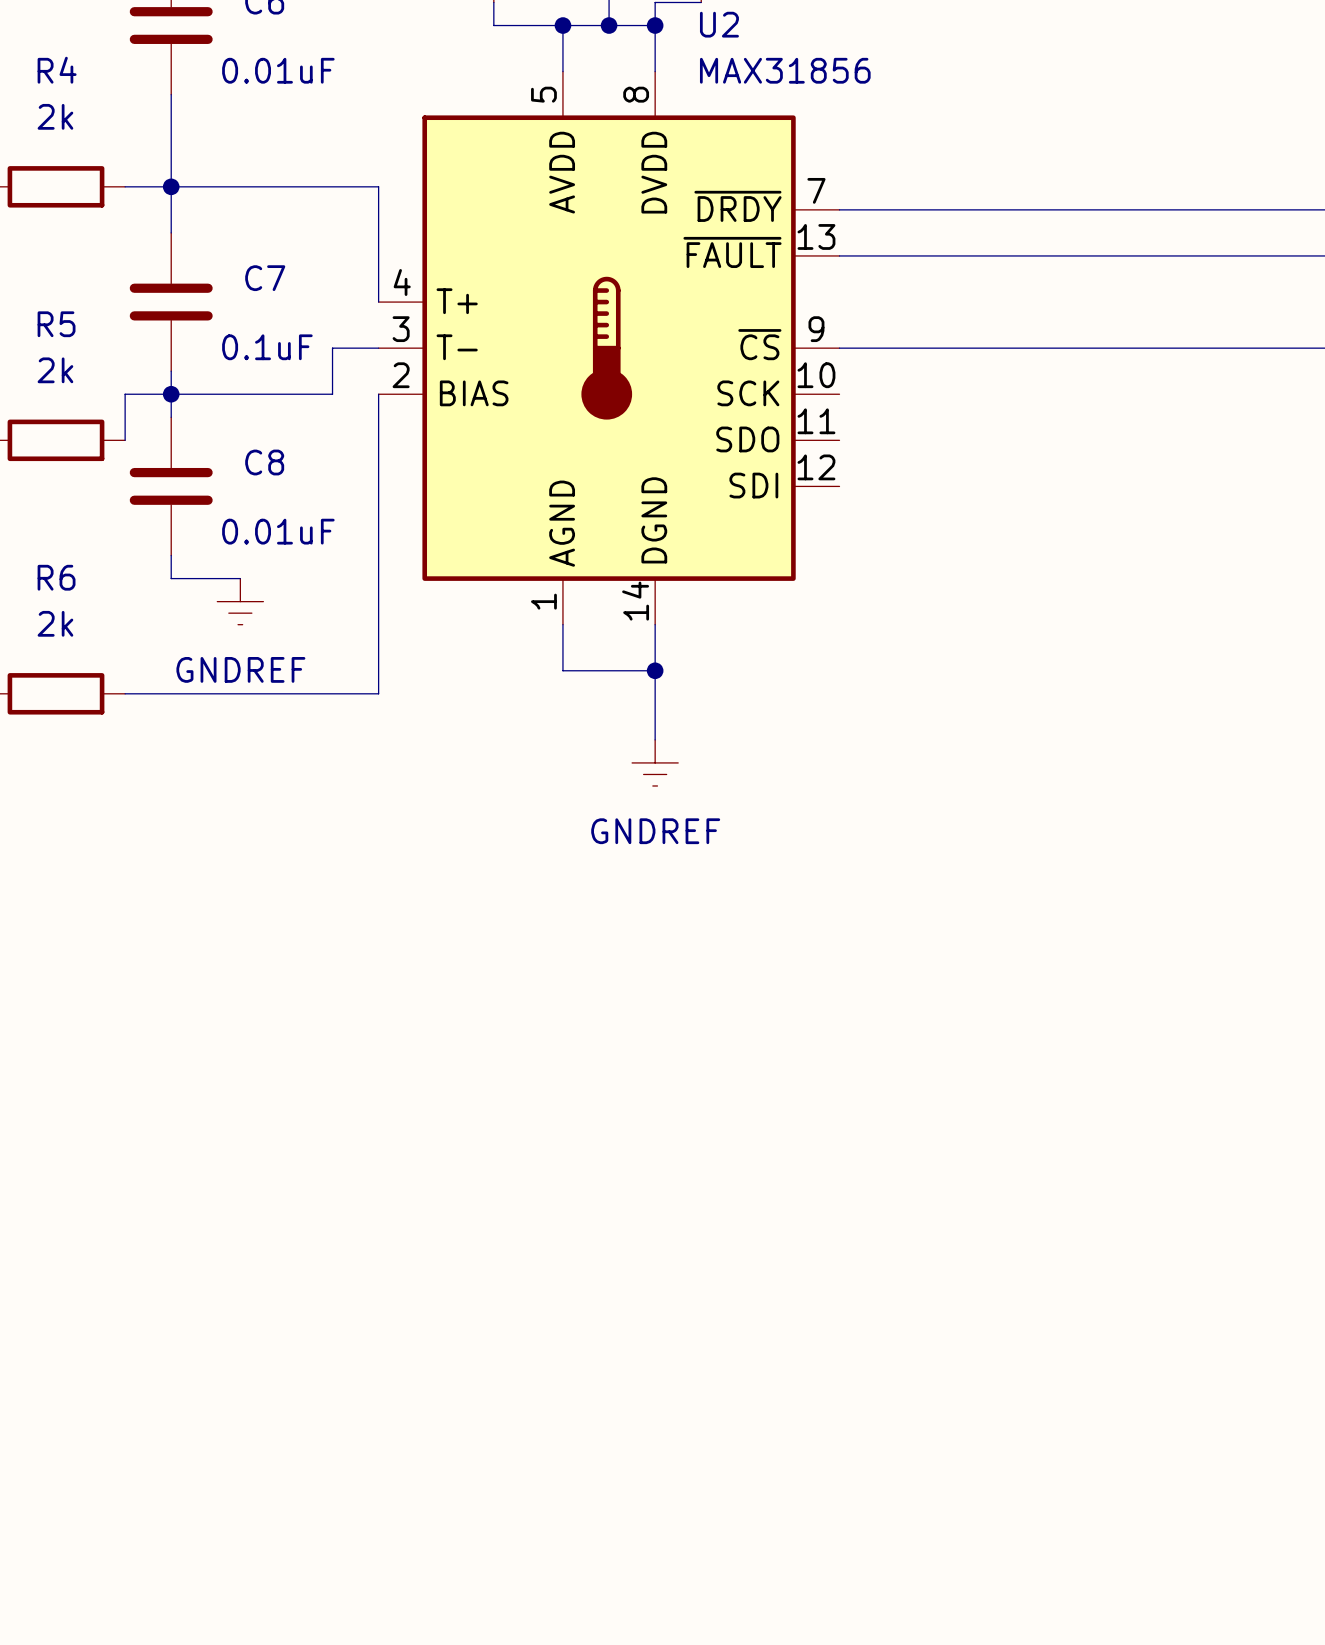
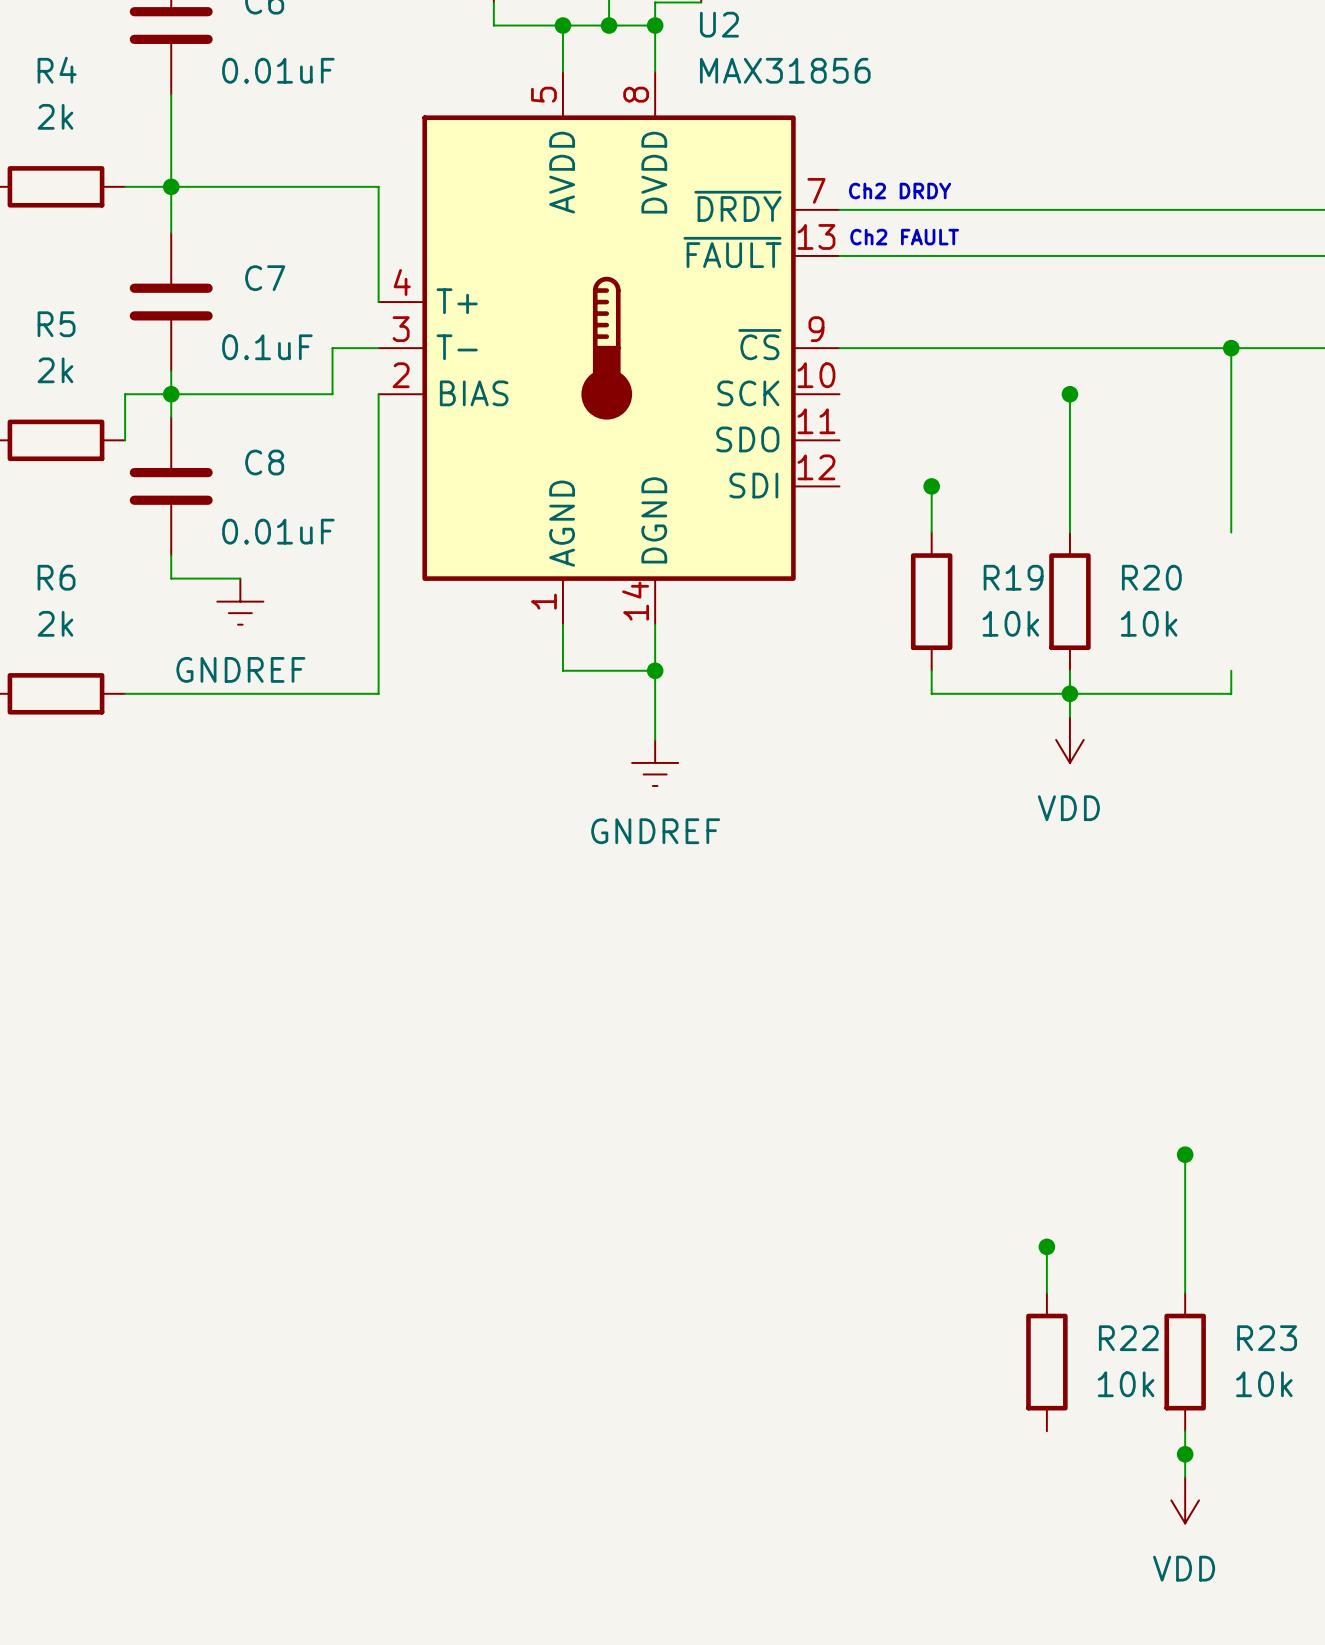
text: none -> Ch2 DRDY (900, 191)
text: none -> Ch2 FAULT (904, 237)
wire: none -> (1231, 348) (1231, 532)
junction: none -> (1231, 348)
wire: none -> (1069, 394) (1069, 532)
junction: none -> (1069, 394)
wire: none -> (931, 486) (931, 532)
junction: none -> (931, 486)
R19: none -> 10k (931, 601)
R20: none -> 10k (1069, 601)
wire: none -> (931, 670) (931, 693) (1231, 693) (1231, 670)
wire: none -> (1069, 670) (1069, 716)
junction: none -> (1069, 693)
power symbol: none -> VDD (1069, 739)
wire: none -> (1185, 1154) (1185, 1292)
junction: none -> (1185, 1154)
wire: none -> (1046, 1246) (1046, 1292)
junction: none -> (1046, 1246)
R22: none -> 10k (1046, 1362)
R23: none -> 10k (1185, 1362)
wire: none -> (1185, 1431) (1185, 1477)
junction: none -> (1185, 1454)
power symbol: none -> VDD (1185, 1500)

